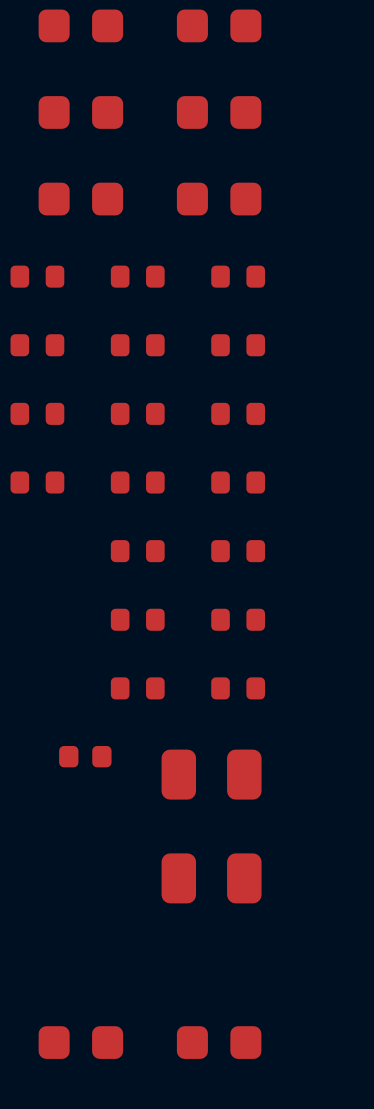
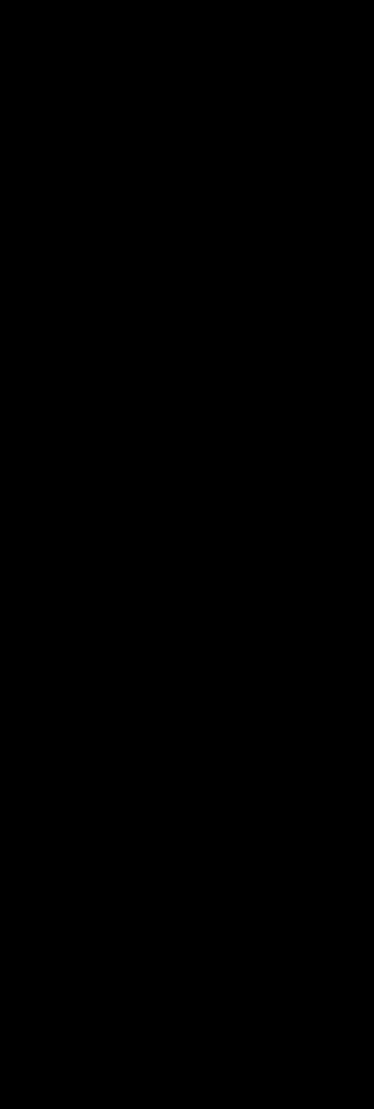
part: (80, 25) -> none
part: (219, 25) -> none
part: (80, 112) -> none
part: (219, 112) -> none
part: (80, 199) -> none
part: (219, 199) -> none
part: (37, 276) -> none
part: (137, 276) -> none
part: (238, 276) -> none
part: (37, 345) -> none
part: (137, 345) -> none
part: (238, 345) -> none
part: (37, 413) -> none
part: (137, 413) -> none
part: (238, 413) -> none
part: (37, 482) -> none
part: (137, 482) -> none
part: (238, 482) -> none
part: (137, 551) -> none
part: (238, 551) -> none
part: (137, 619) -> none
part: (238, 619) -> none
part: (137, 688) -> none
part: (238, 688) -> none
part: (85, 756) -> none
part: (211, 774) -> none
part: (211, 878) -> none
part: (80, 1042) -> none
part: (219, 1042) -> none

